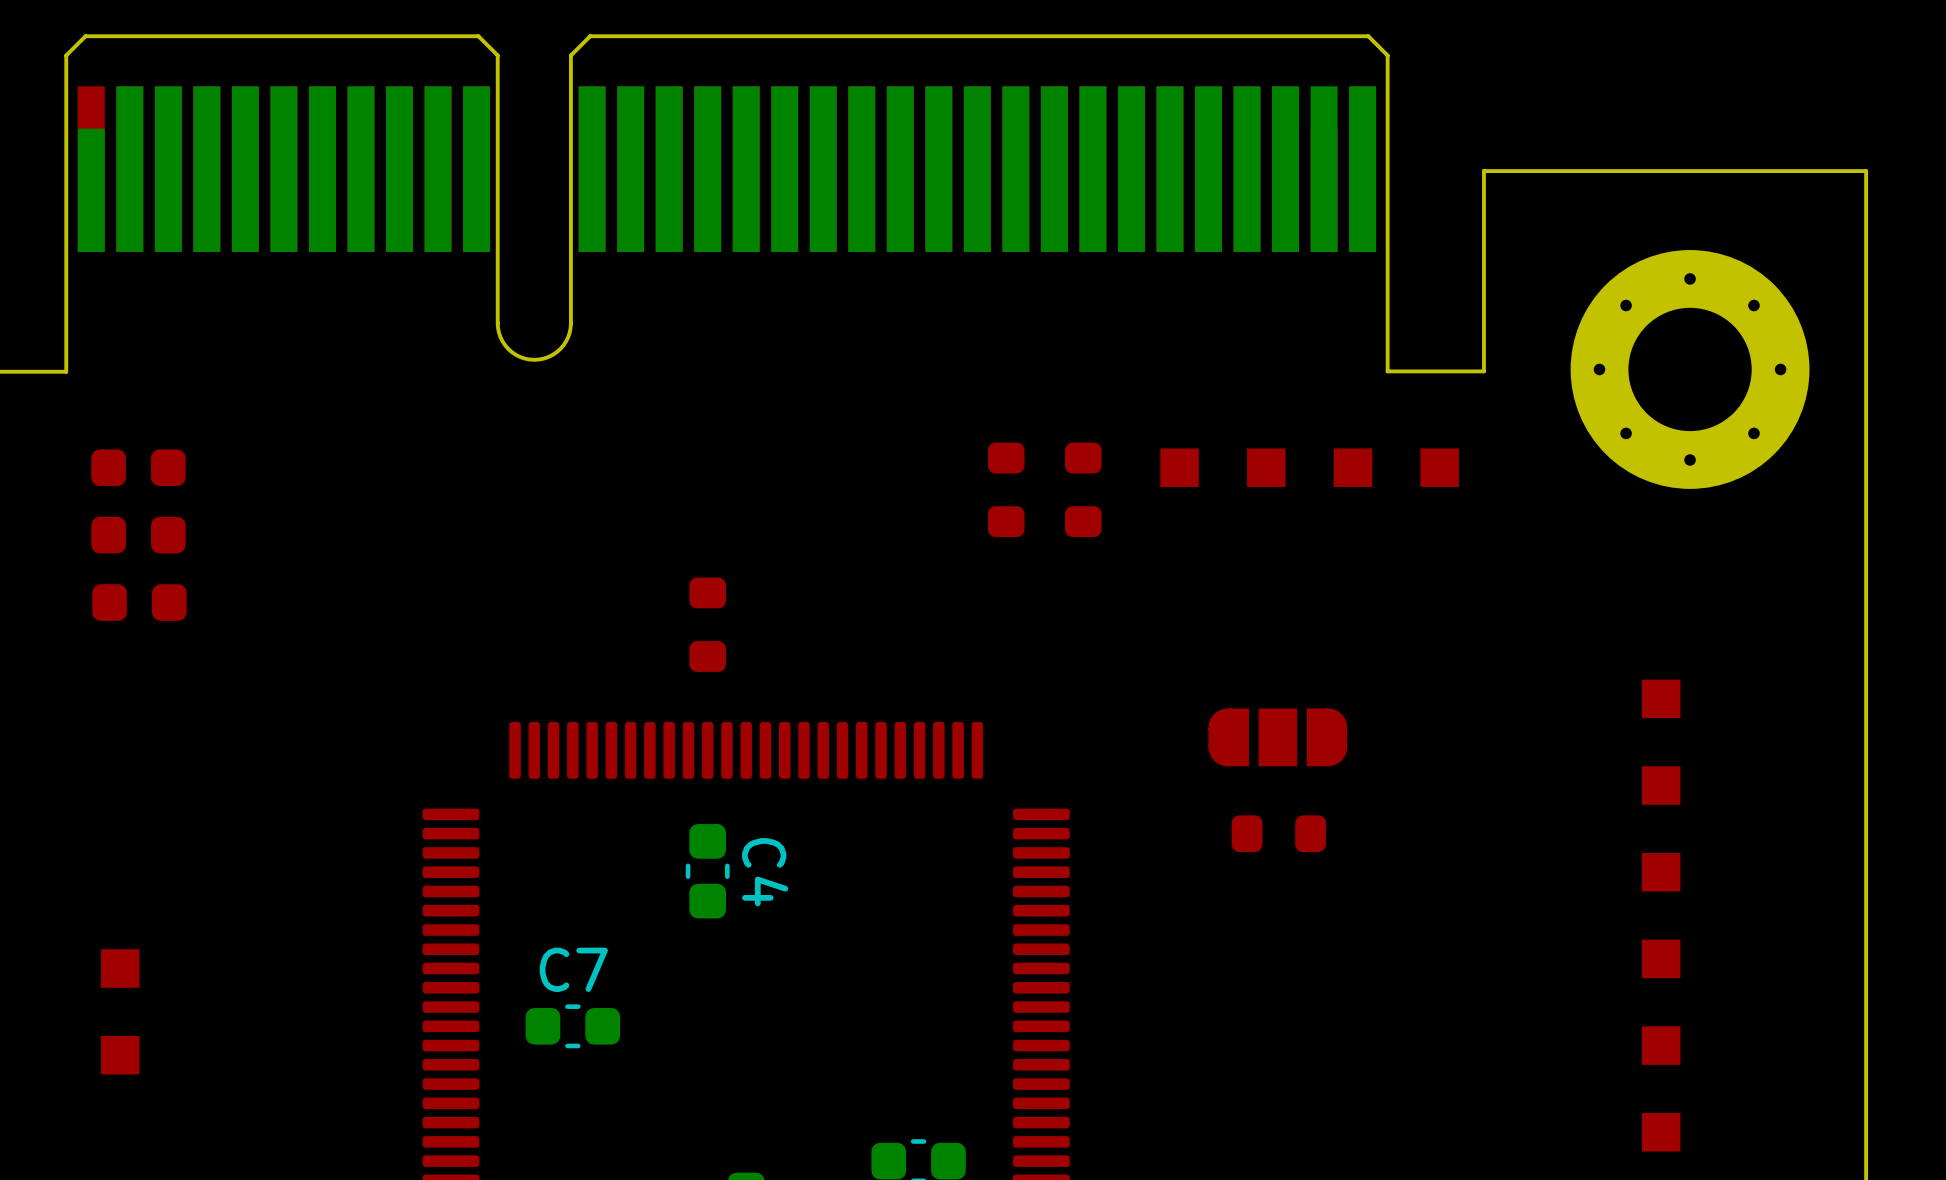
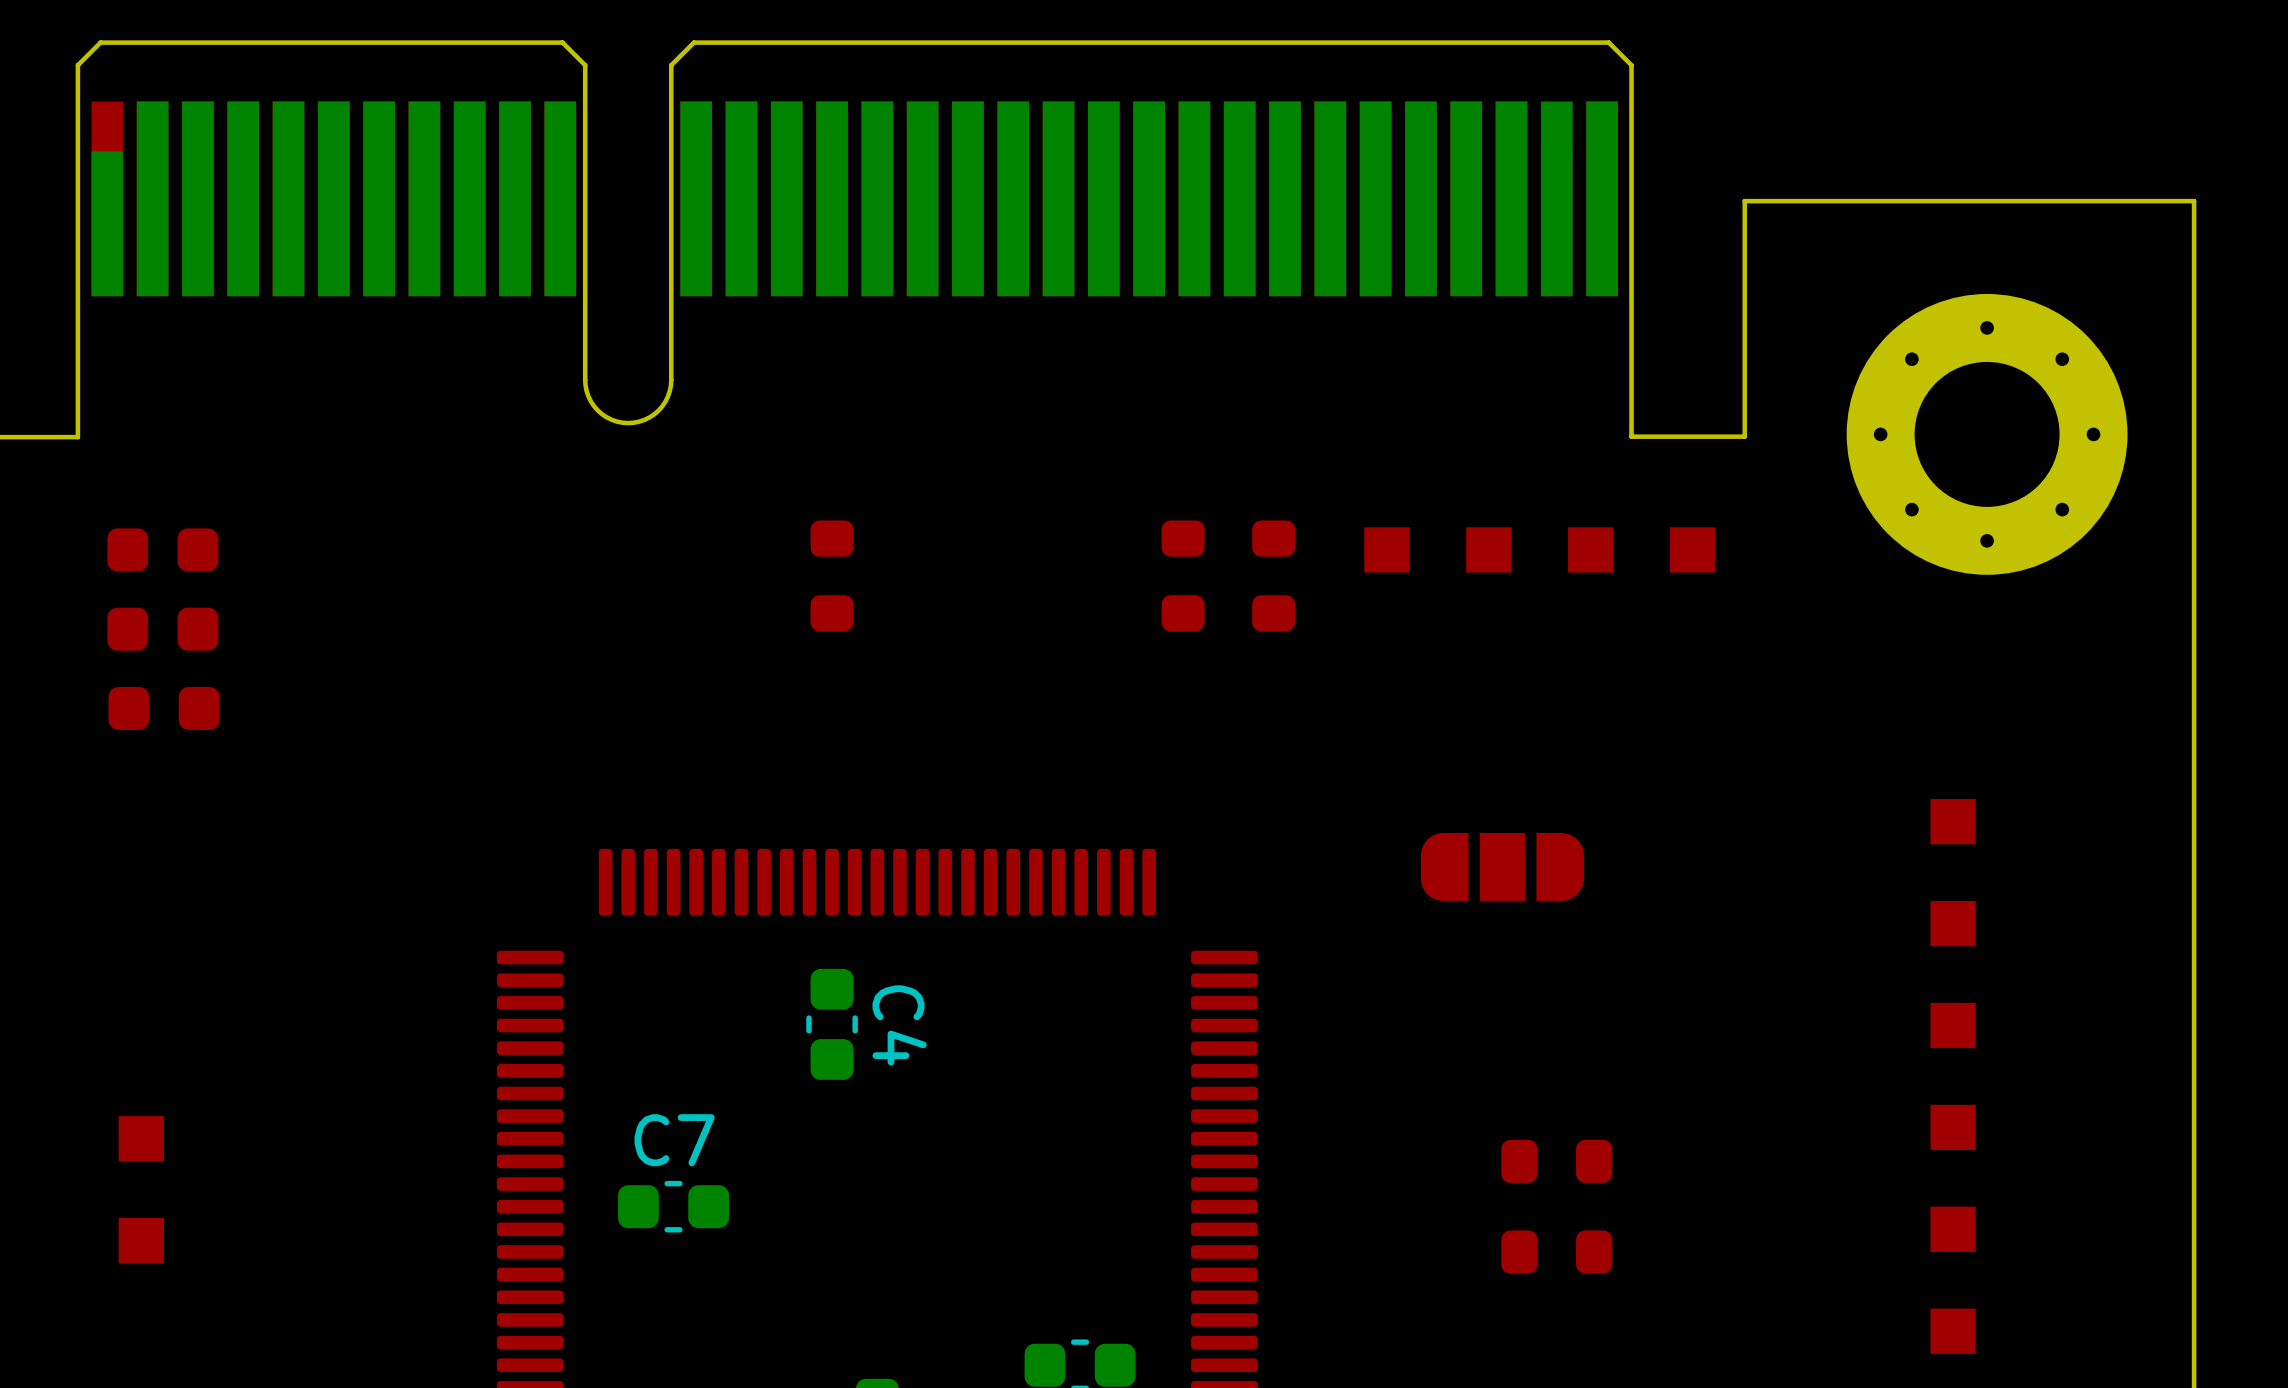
part position: (707, 624) -> (832, 575)
part: (1278, 833) -> none
part: none -> (1556, 1161)
part: none -> (1556, 1251)

